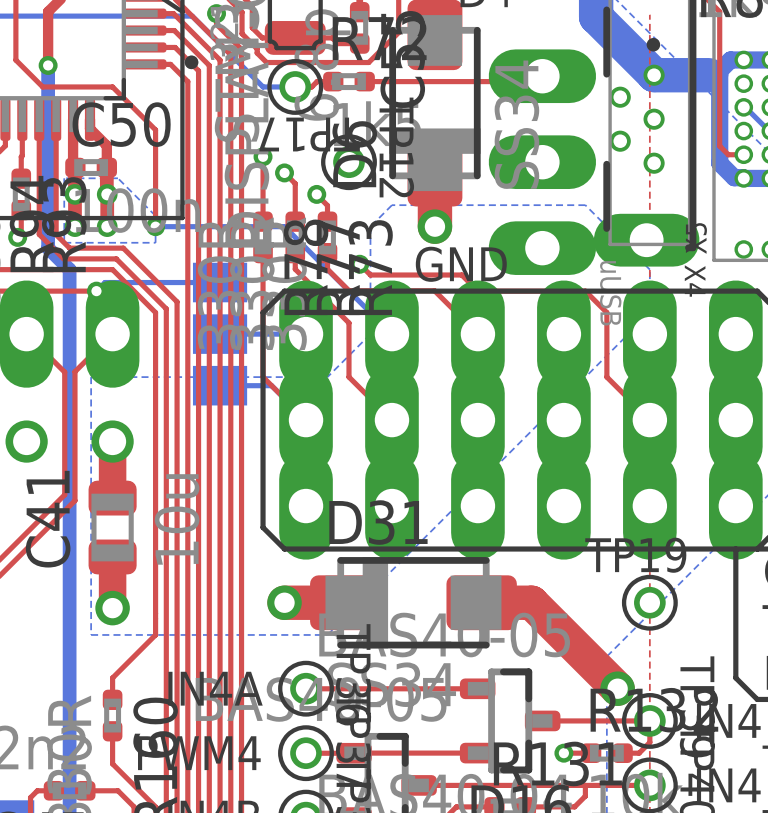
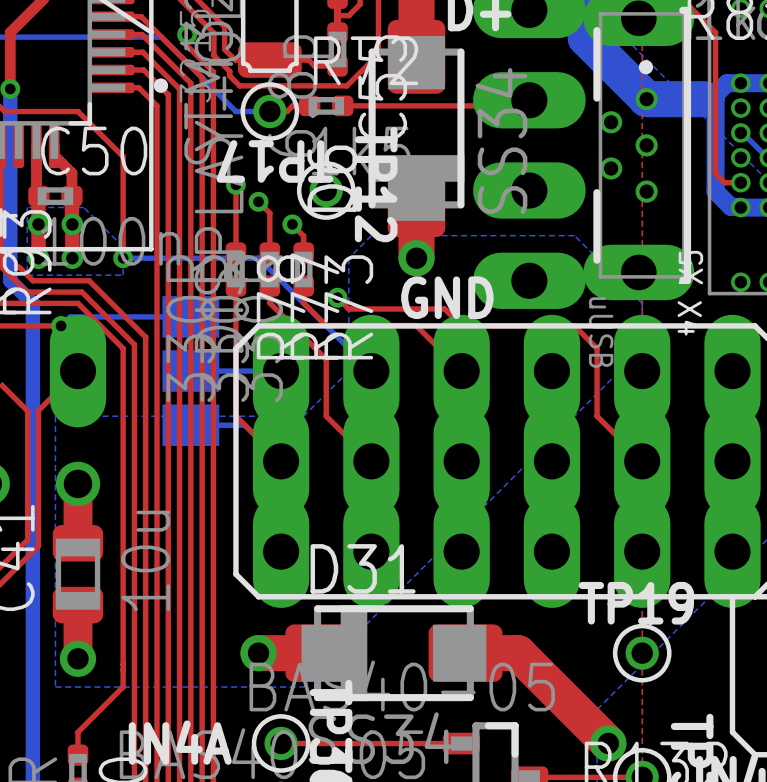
top track: (56, 119) (56, 234) -> none

